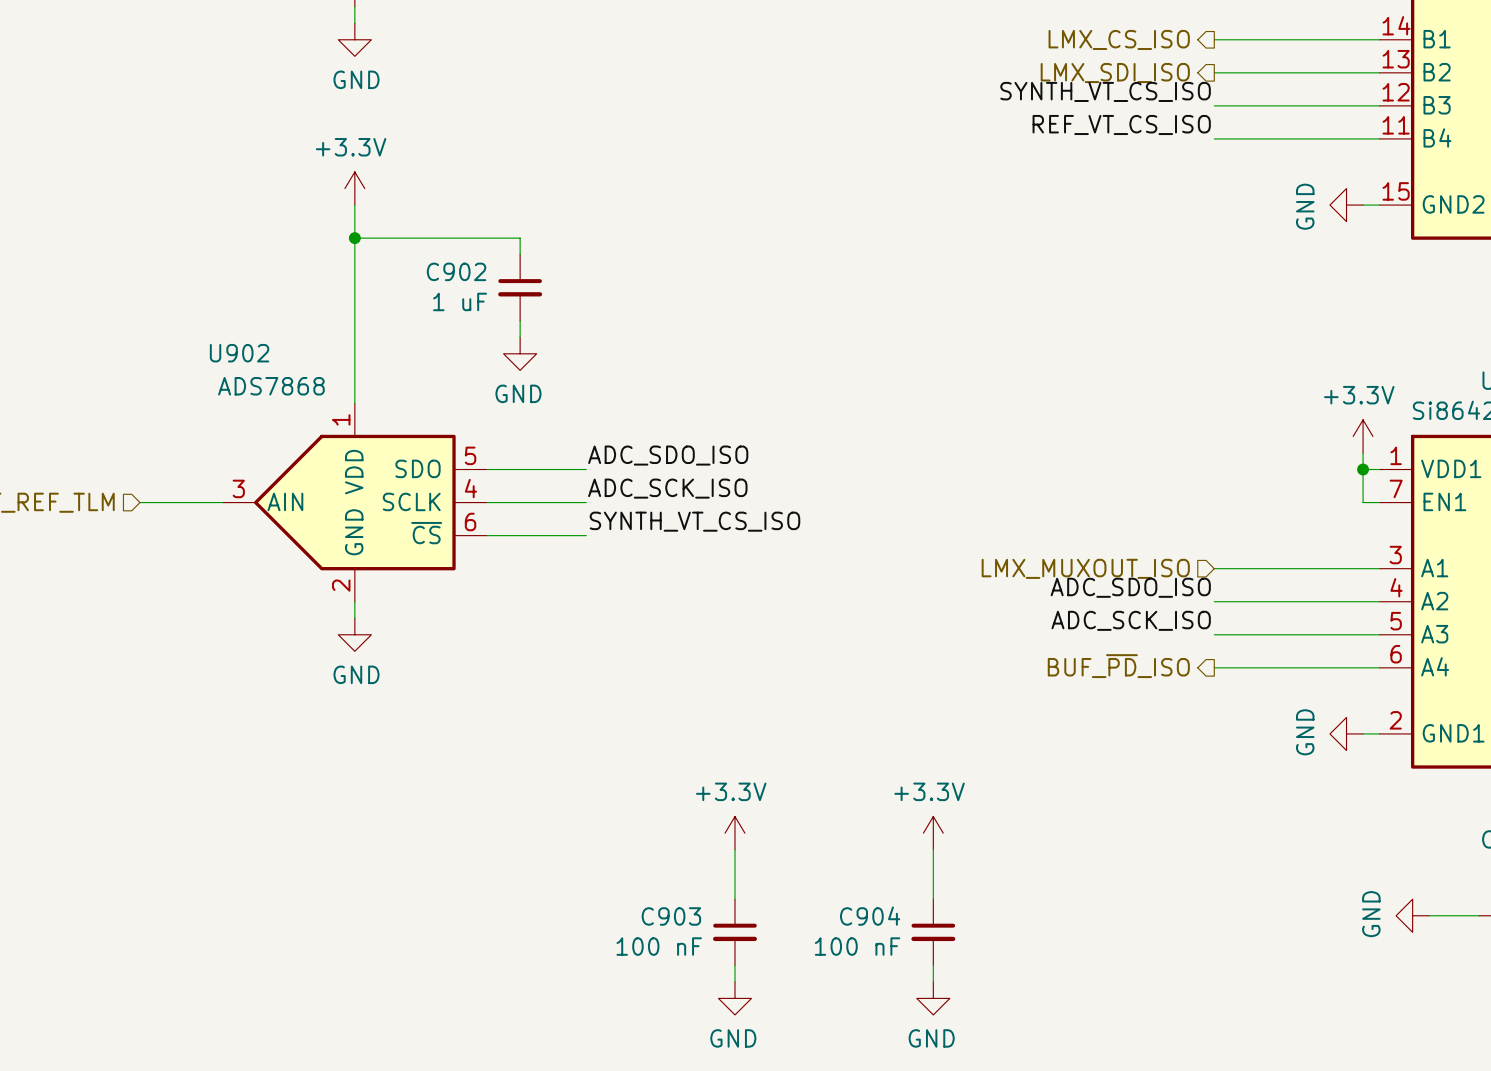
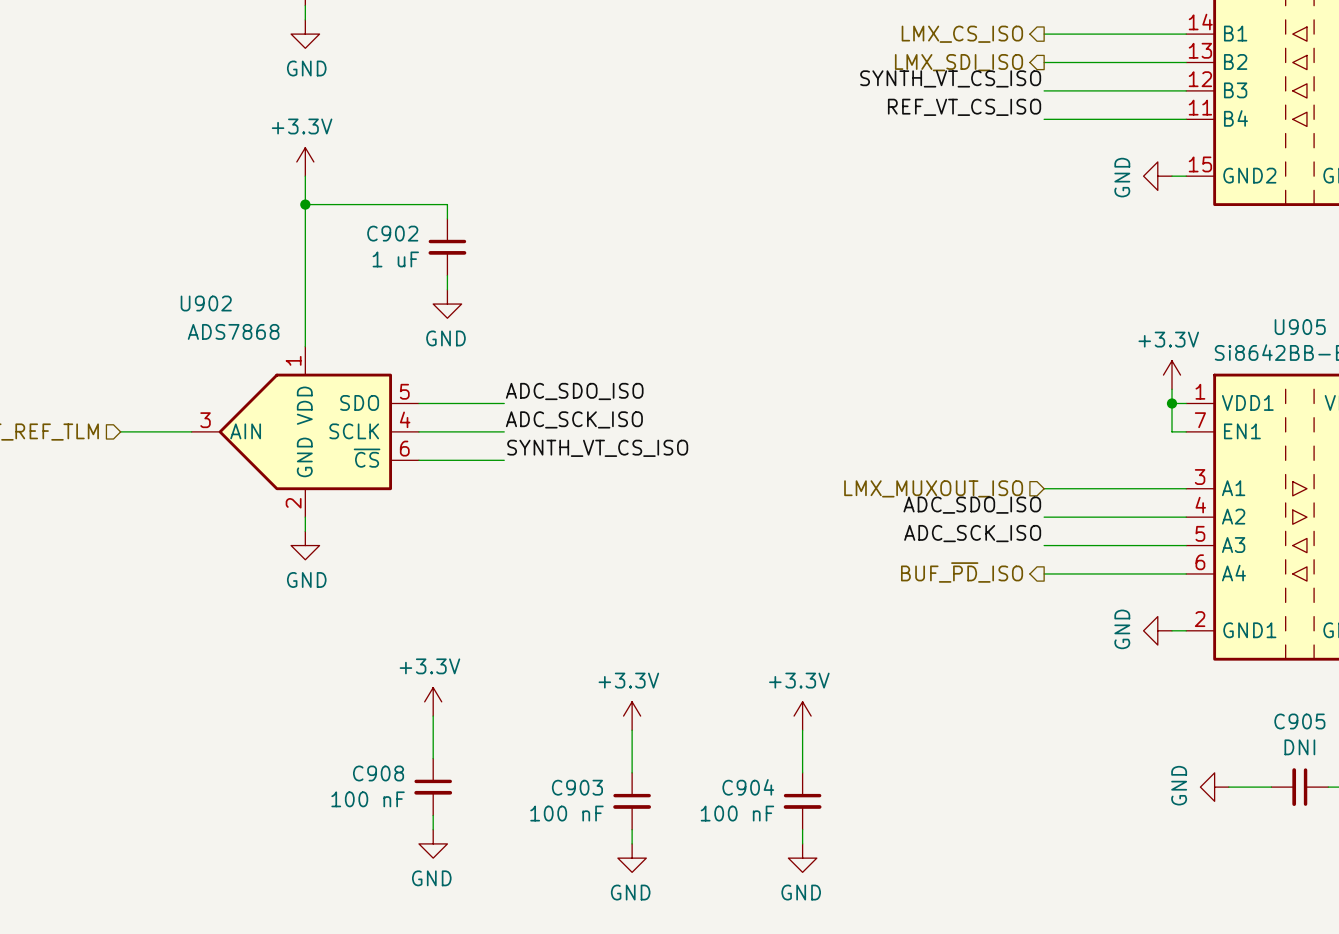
power symbol: none -> +3.3V (433, 701)
wire: none -> (433, 716) (433, 758)
C908: none -> 100 nF (433, 787)
wire: none -> (433, 815) (433, 829)
power symbol: none -> GND (433, 843)

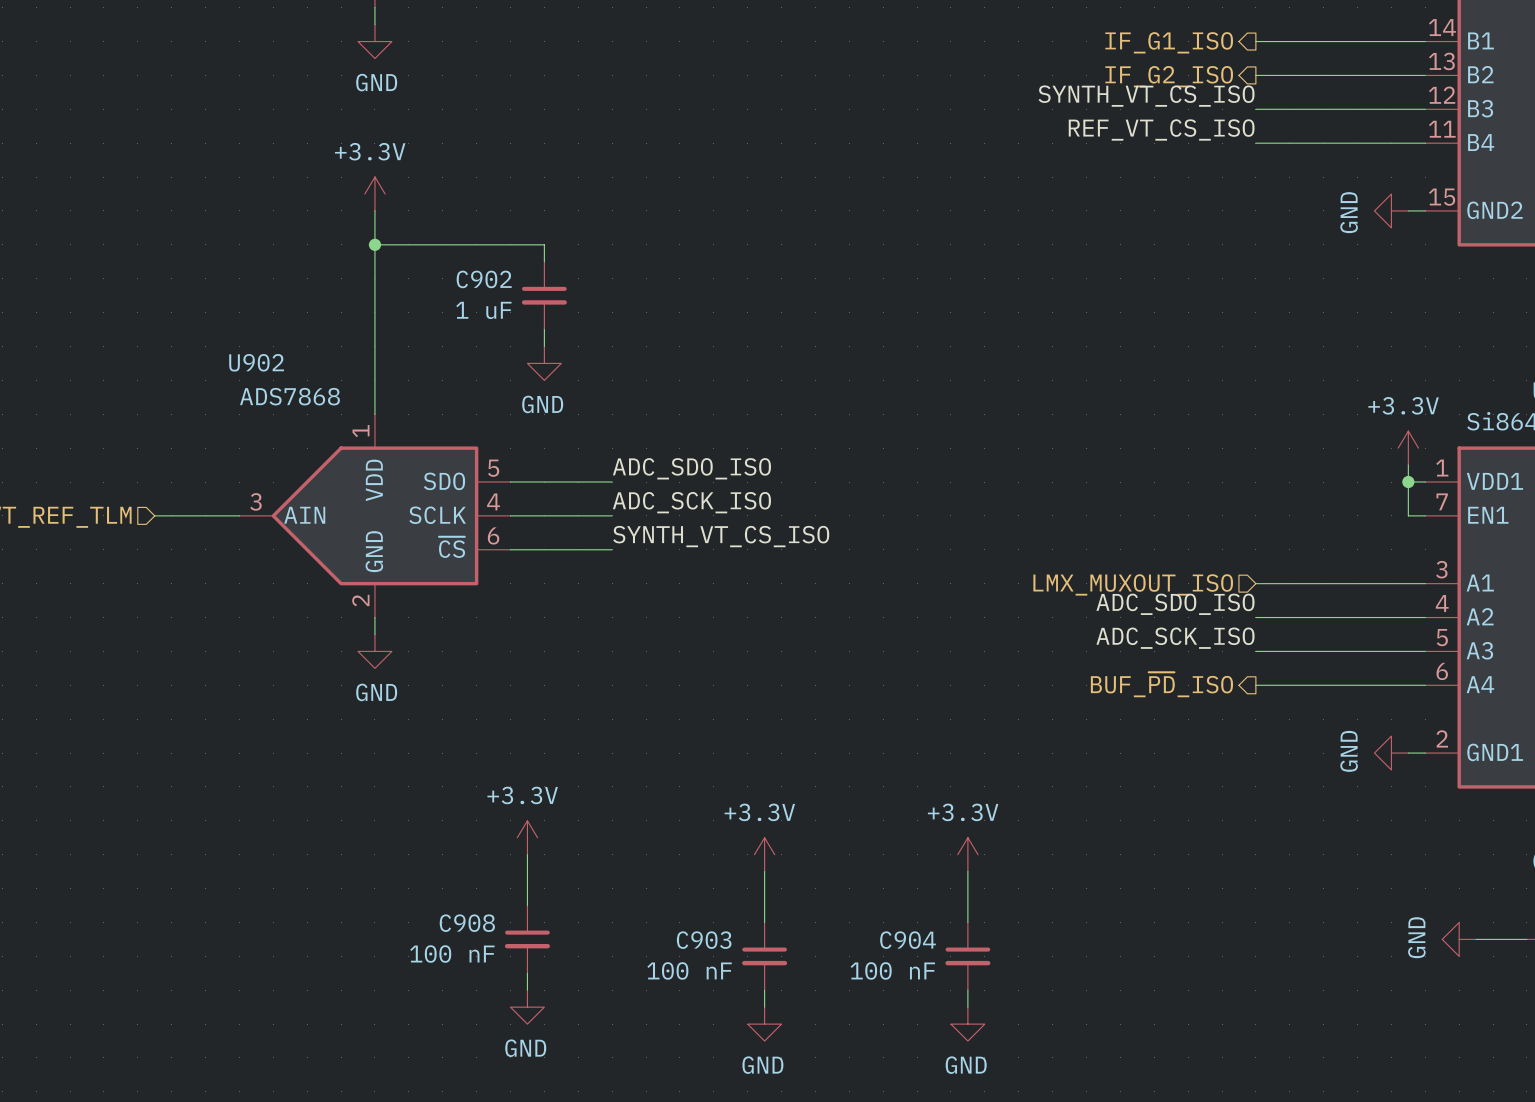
hierarchical label: LMX_CS_ISO (962, 34) -> IF_G1_ISO (1169, 42)
hierarchical label: LMX_SDI_ISO (959, 62) -> IF_G2_ISO (1169, 76)

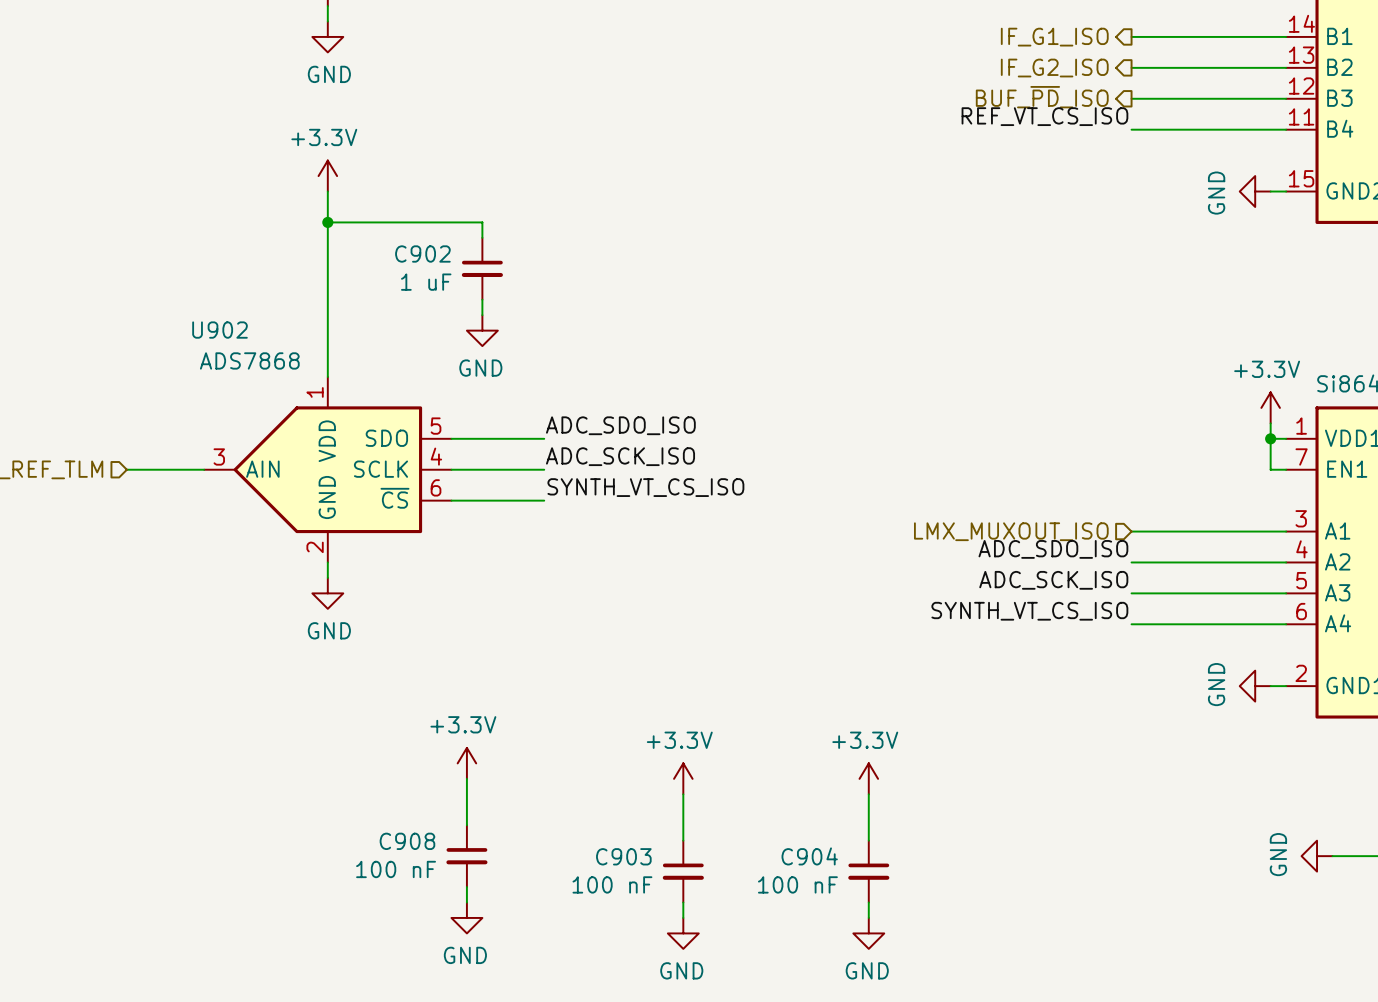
label: SYNTH_VT_CS_ISO (1146, 96) -> none
hierarchical label: none -> BUF_~{PD}_ISO (1042, 97)
label: none -> SYNTH_VT_CS_ISO (1029, 611)
hierarchical label: BUF_~{PD}_ISO (1161, 684) -> none

